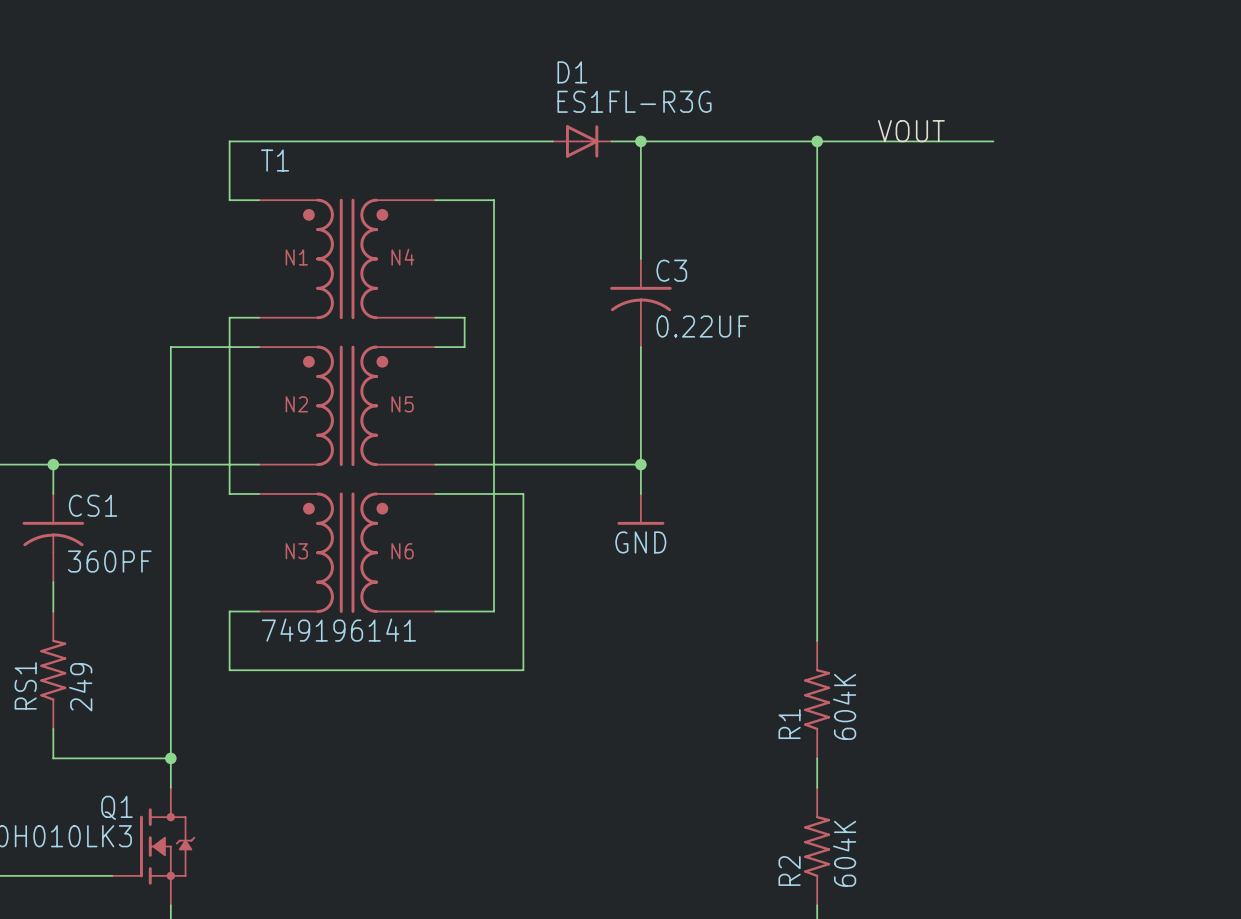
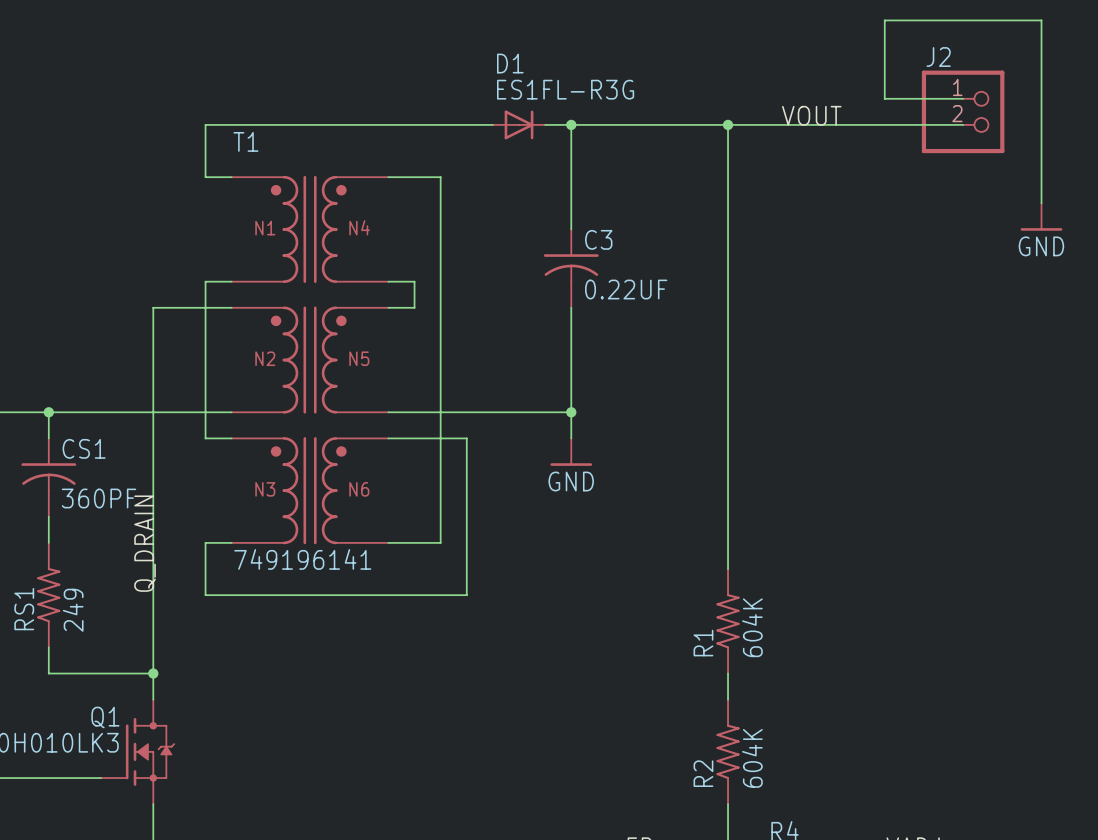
wire: none -> (963, 98) (884, 98) (884, 20) (1041, 20) (1041, 203)
J2: none -> (963, 111)
wire: none -> (884, 124) (963, 124)
power symbol: none -> GND (1041, 217)
label: none -> Q_DRAIN (145, 543)

